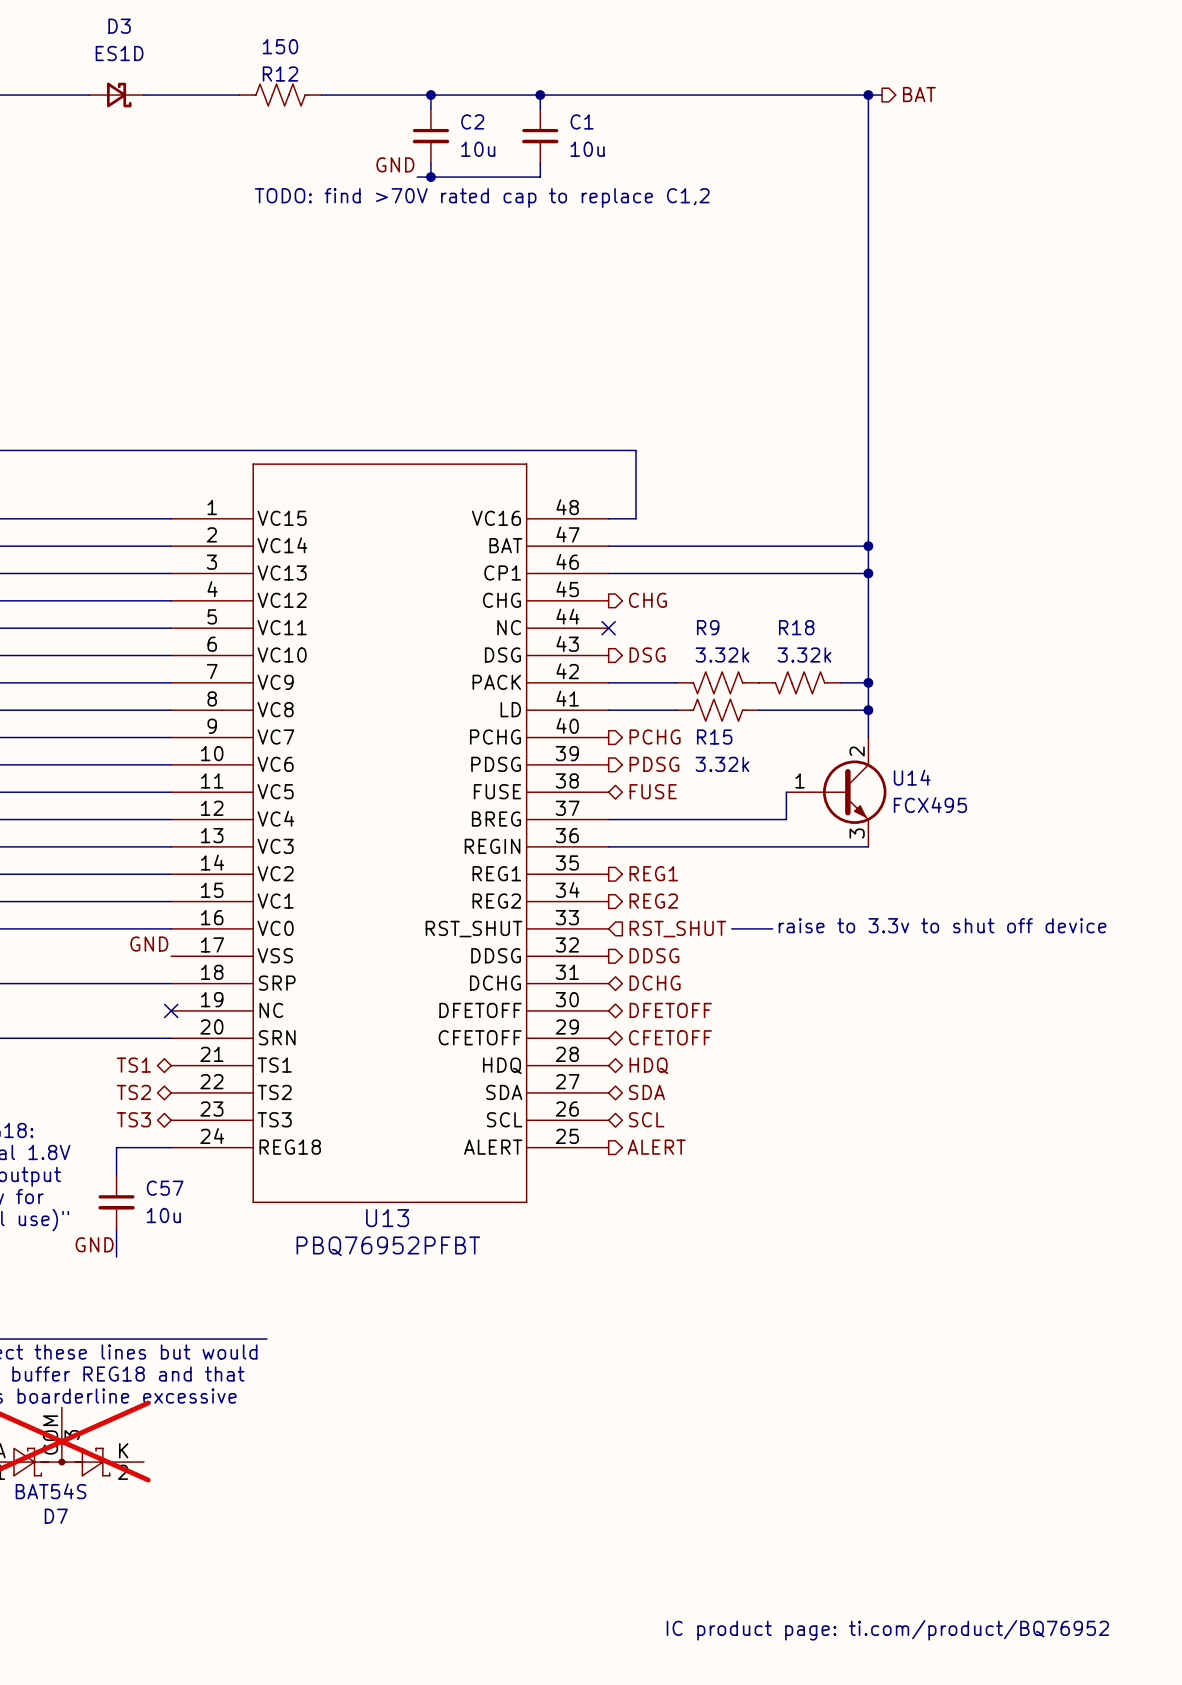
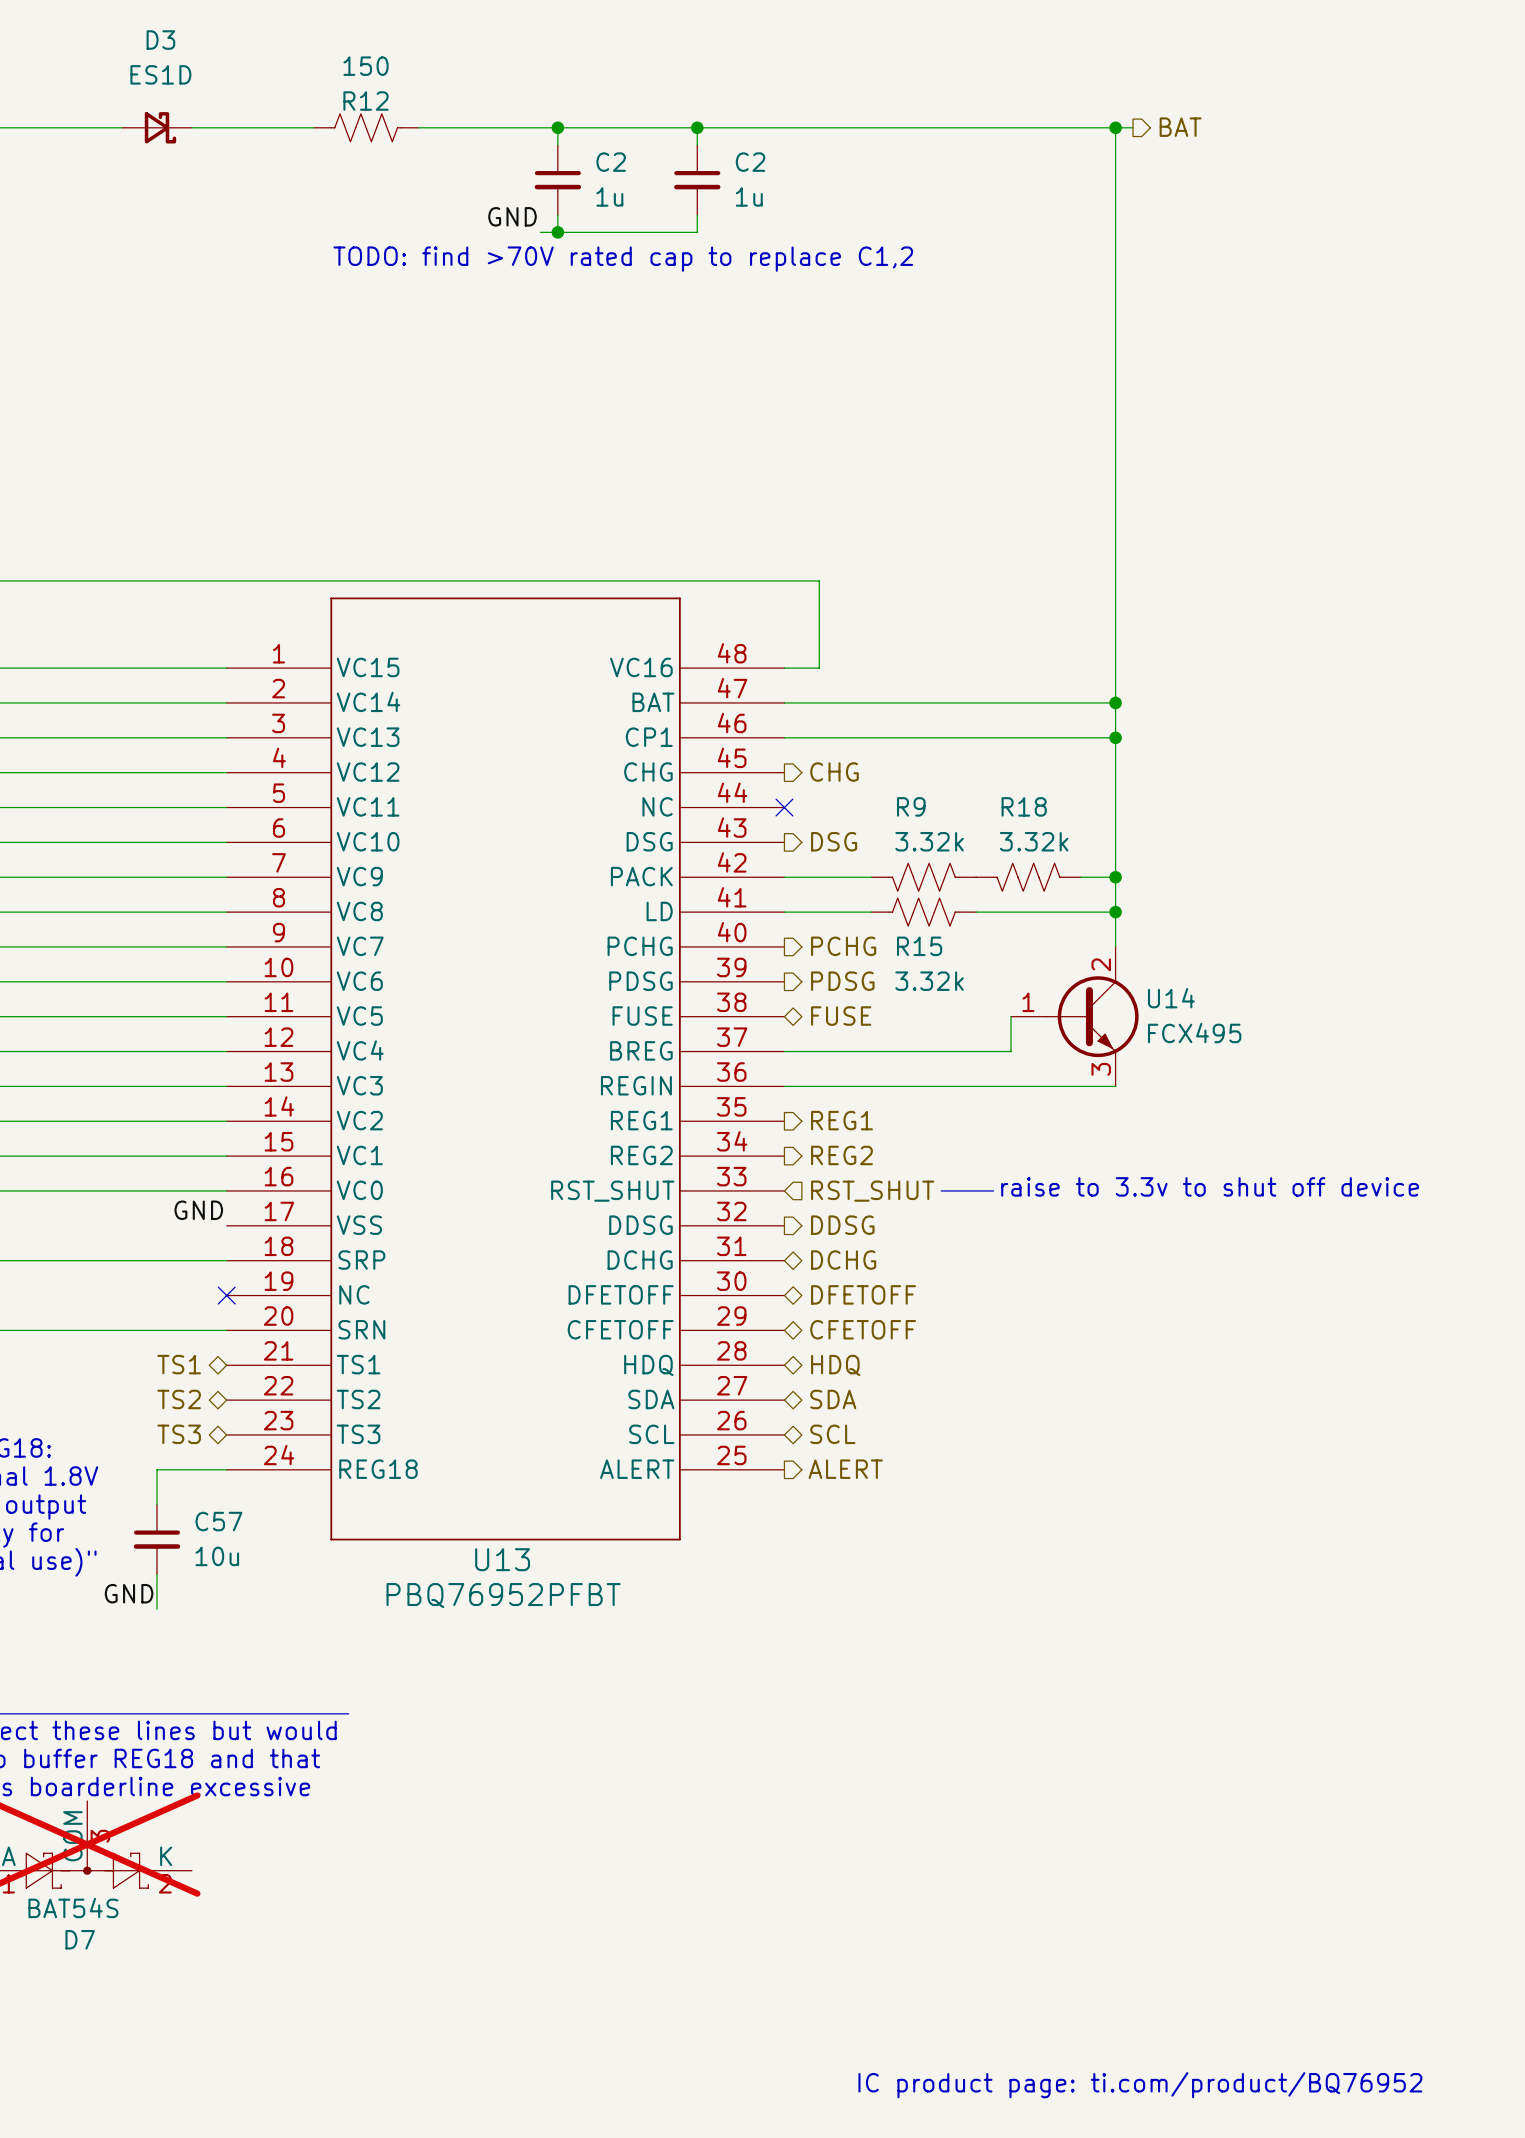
C1 name: C1 (582, 121) -> C2 (750, 162)
C2 value: 10u (478, 149) -> 1u (609, 196)
C1 value: 10u (587, 149) -> 1u (749, 196)

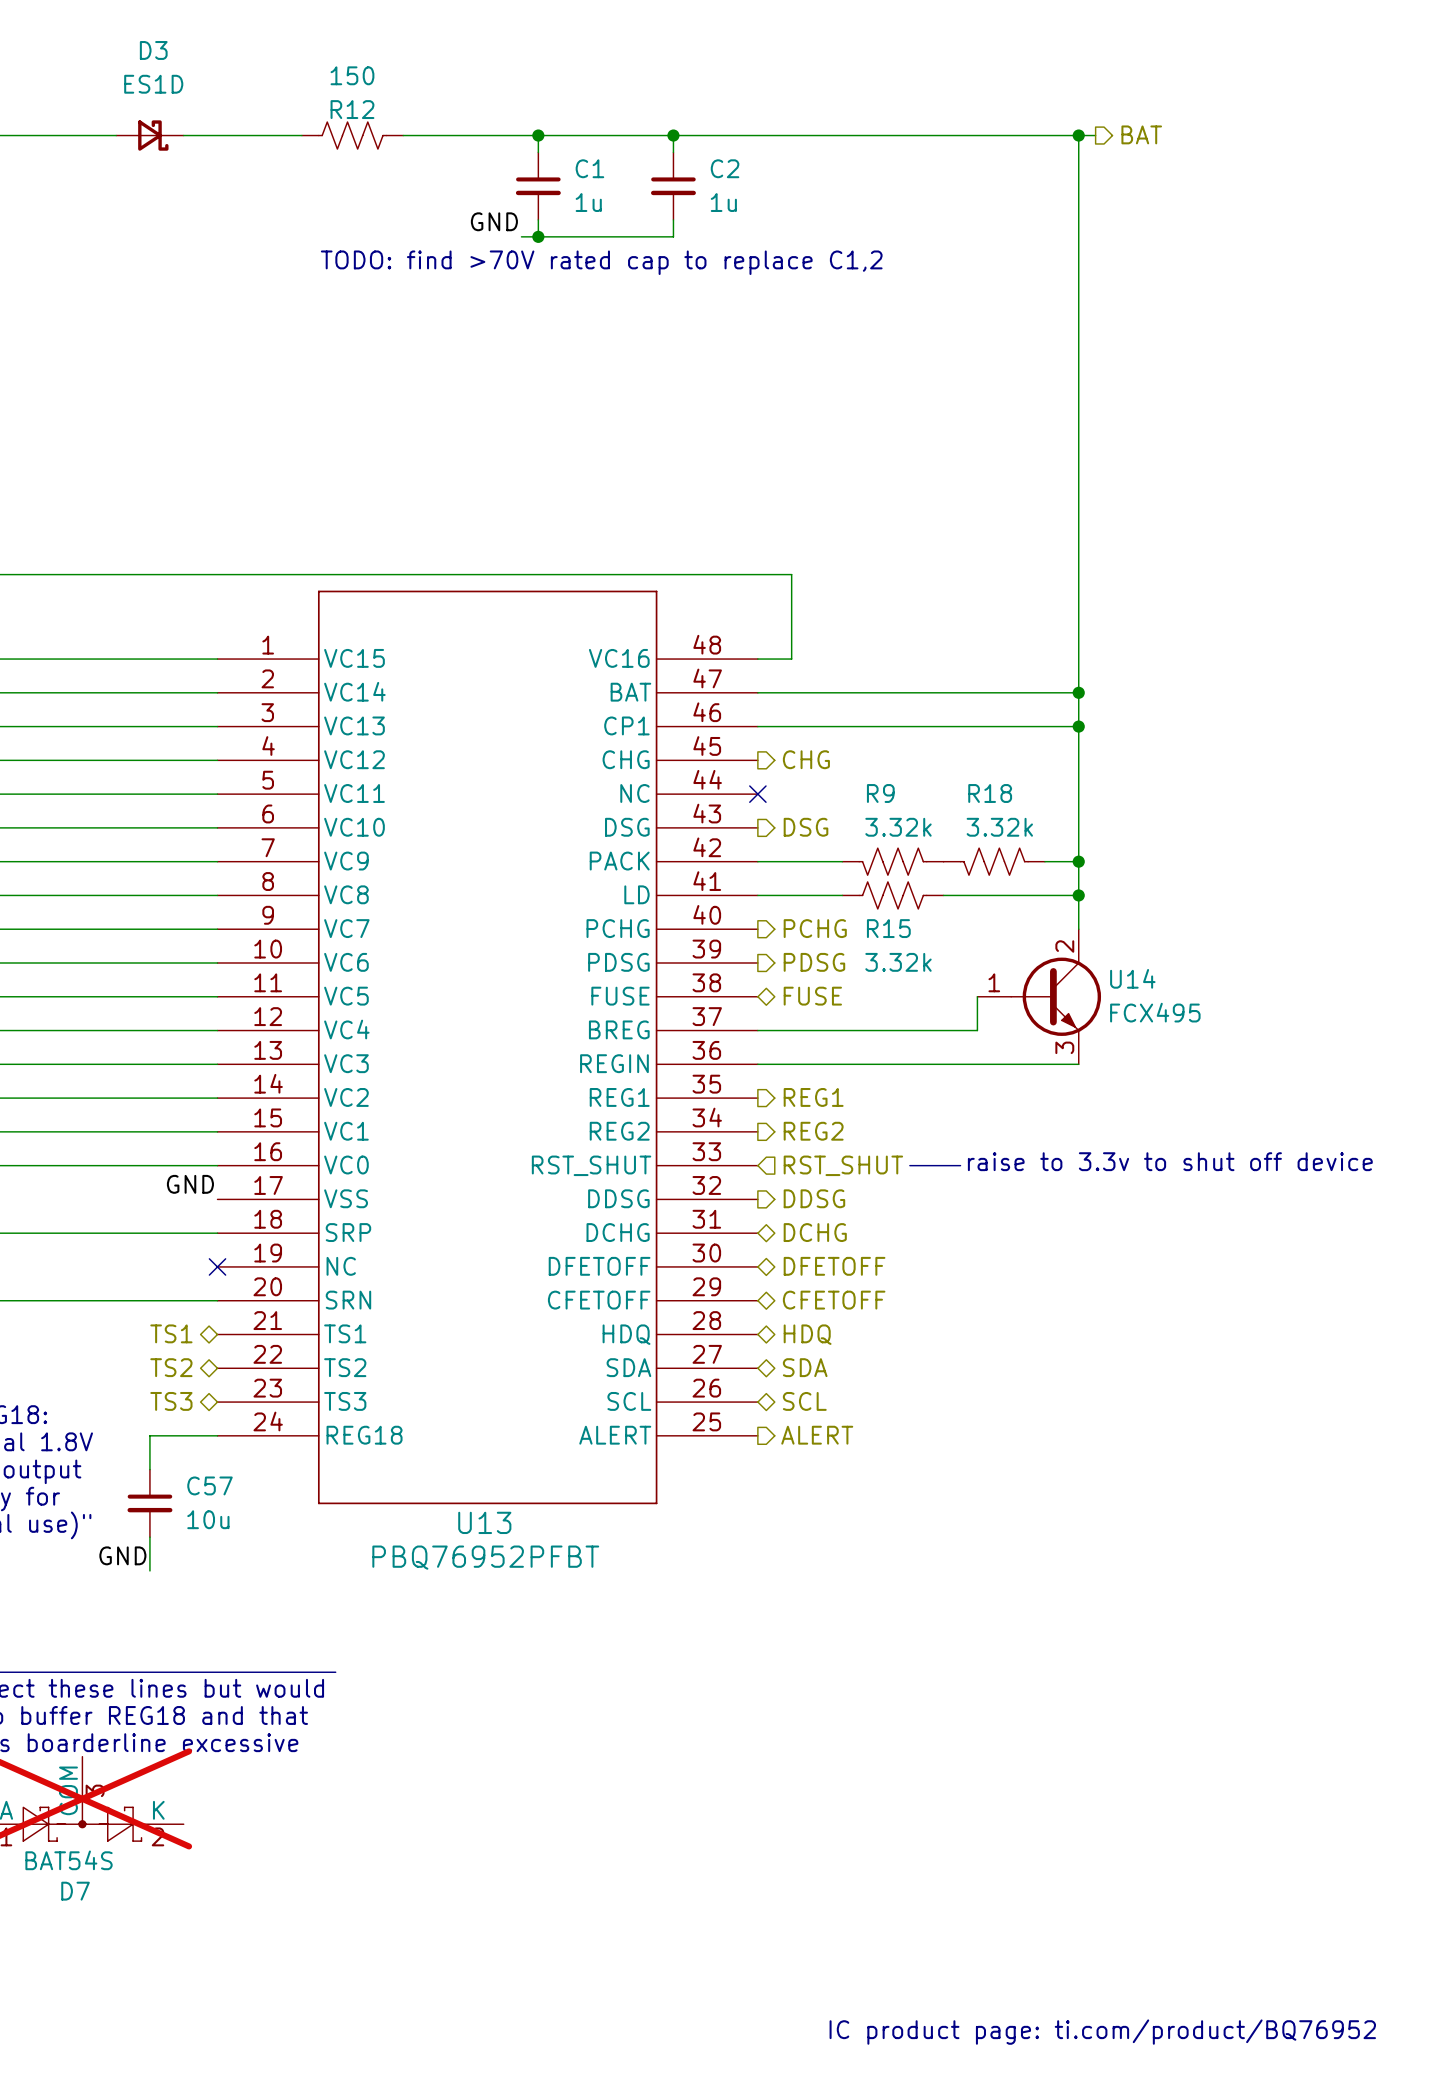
C2 name: C2 (611, 162) -> C1 (589, 168)

